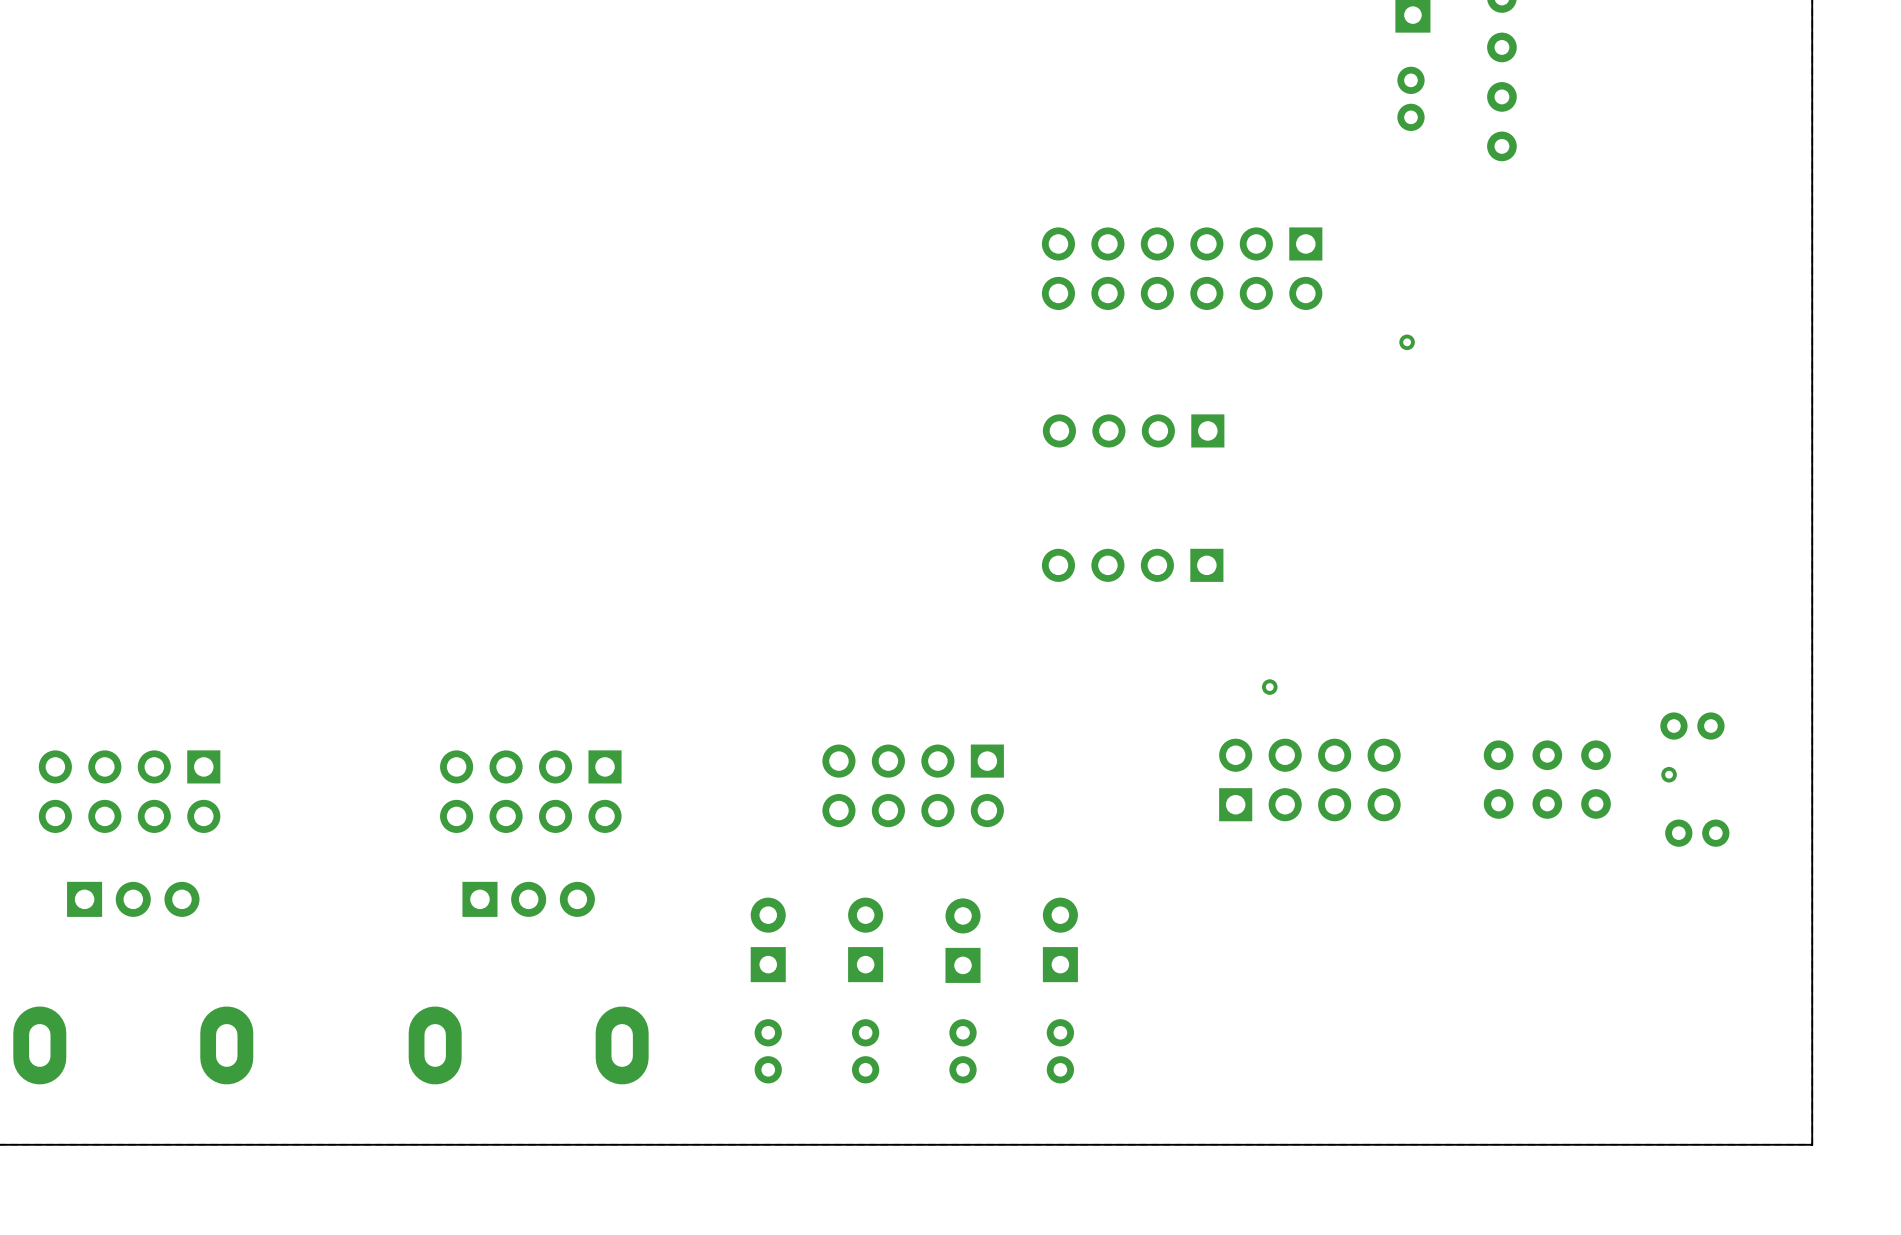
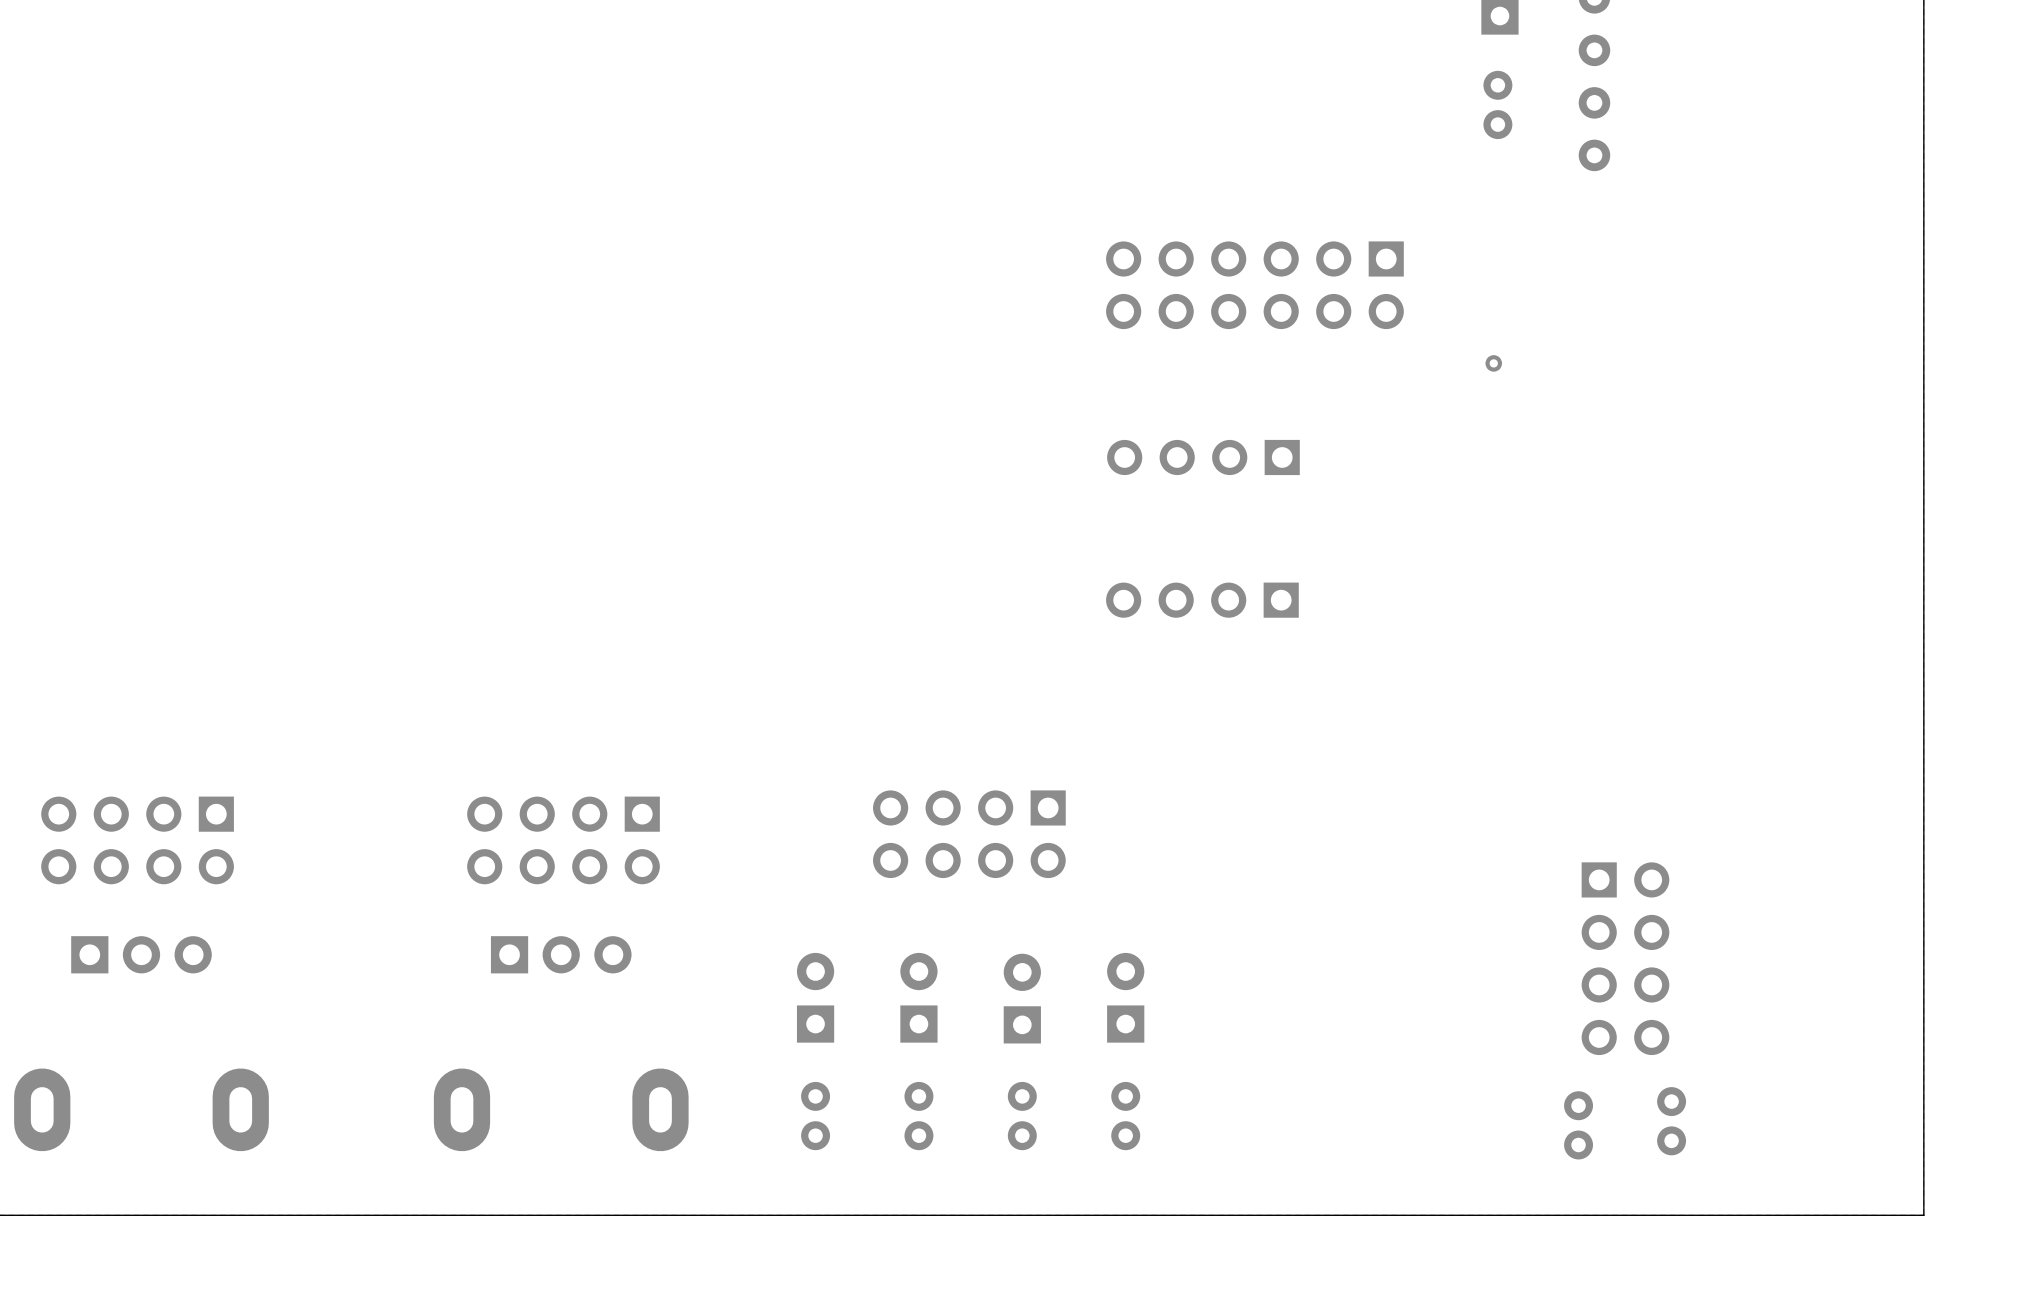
via: (1269, 687) -> none
part: (1692, 726) -> none
via: (1669, 774) -> none
part rotation: 0° (1309, 779) -> 90° clockwise (1625, 958)
part position: (1309, 779) -> (1625, 958)
part: (1547, 779) -> none
part: (1697, 833) -> none
part: none -> (1671, 1121)
part: none -> (1578, 1125)

